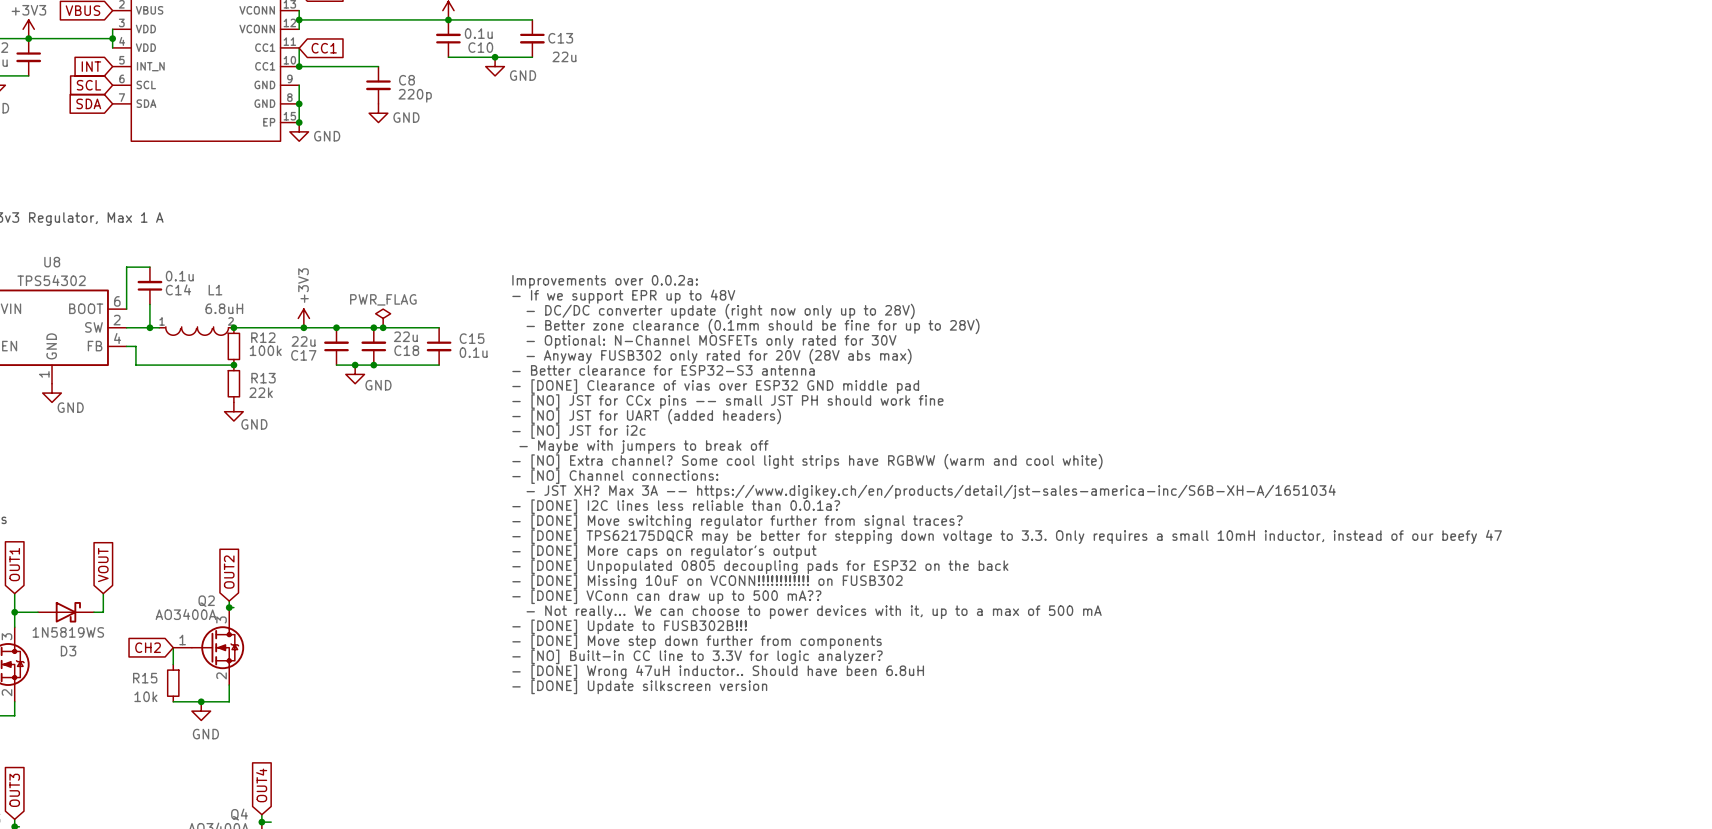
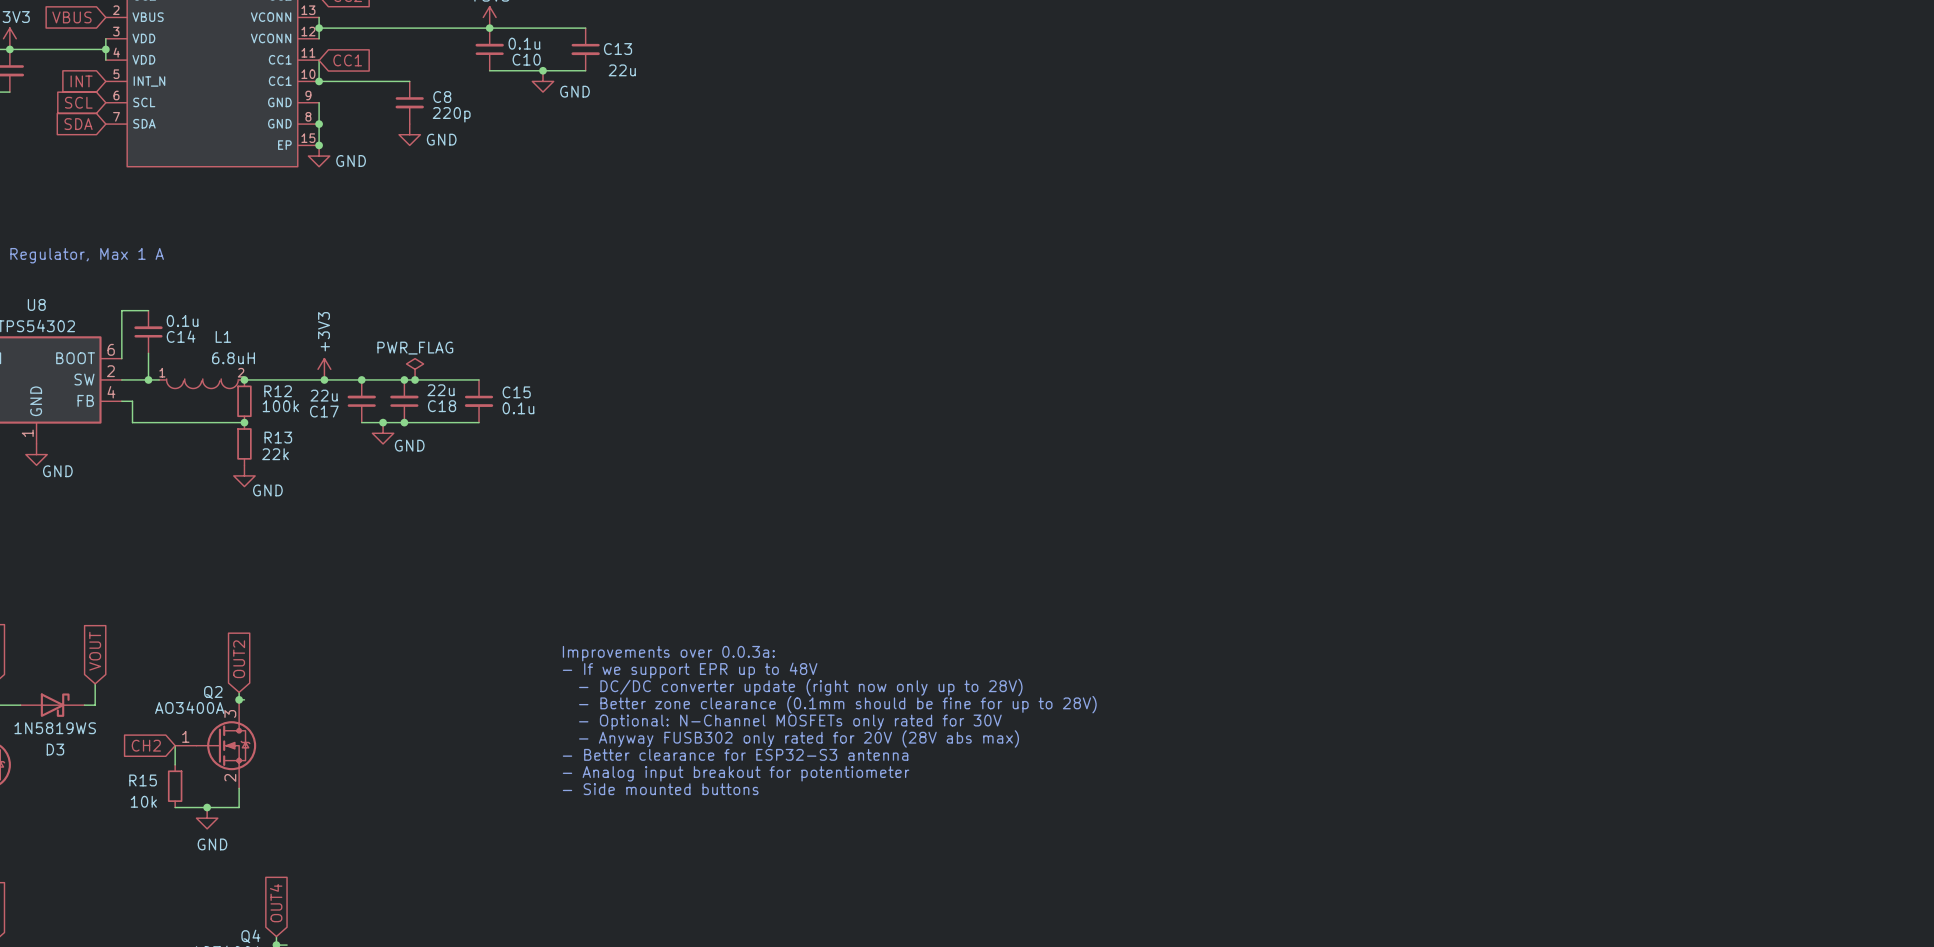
text: Improvements over 0.0.2a: (605, 281) -> none
text: - If we support EPR up to 48V (623, 296) -> none
text: - DC/DC converter update (right now only up to 28V) (720, 311) -> none
text: - Better zone clearance (0.1mm should be fine for up to 28V) (753, 326) -> none
text: - Optional: N-Channel MOSFETs only rated for 30V (711, 341) -> none
text: - Anyway FUSB302 only rated for 20V (28V abs max) (719, 356) -> none
text: - Better clearance for ESP32-S3 antenna (663, 370) -> none
text: - [DONE] Clearance of vias over ESP32 GND middle pad (715, 386) -> none
text: - [NO] JST for CCx pins -- small JST PH should work fine (727, 401) -> none
text: - [NO] JST for UART (added headers) (646, 416) -> none
text: - [NO] JST for i2c (578, 431) -> none
text: - Maybe with jumpers to break off (643, 447) -> none
text: - [NO] Extra channel? Some cool light strips have RGBWW (warm and cool white) (807, 461) -> none
text: - [NO] Channel connections: (615, 476) -> none
text: - JST XH? Max 3A -- https://www.digikey.ch/en/products/detail/jst-sales-america-inc/S6B-XH-A/1651034 (931, 491) -> none
text: - [DONE] I2C lines less reliable than 0.0.1a? (676, 506) -> none
text: - [DONE] Move switching regulator further from signal traces? (737, 521) -> none
text: - [DONE] TPS62175DQCR may be better for stepping down voltage to 3.3. Only requires a small 10mH inductor, instead of our beefy 47 (1007, 536) -> none
text: - [DONE] More caps on regulator's output (664, 551) -> none
text: - [DONE] Unpopulated 0805 decoupling pads for ESP32 on the back (760, 566) -> Improvements over 0.0.3a: (668, 653)
text: - [DONE] Missing 10uF on VCONN!!!!!!!!!!!! on FUSB302 (707, 581) -> - If we support EPR up to 48V (690, 670)
text: - [DONE] VConn can draw up to 500 mA?? (666, 596) -> - DC/DC converter update (right now only up to 28V) (800, 687)
text: - Not really... We can choose to power devices with it, up to a max of 500 mA (814, 612) -> - Better zone clearance (0.1mm should be fine for up to 28V) (837, 704)
text: - [DONE] Update to FUSB302B!!! (629, 626) -> - Optional: N-Channel MOSFETs only rated for 30V (790, 722)
text: - [DONE] Move step down further from components (697, 641) -> - Anyway FUSB302 only rated for 20V (28V abs max) (799, 738)
text: - [NO] Built-in CC line to 3.3V for logic analyzer? (697, 656) -> - Better clearance for ESP32-S3 antenna (735, 754)
text: - [DONE] Wrong 47uH inductor.. Should have been 6.8uH (718, 671) -> - Analog input breakout for potentiometer (736, 773)
text: - [DONE] Update silkscreen version (639, 686) -> - Side mounted buttons (660, 789)

